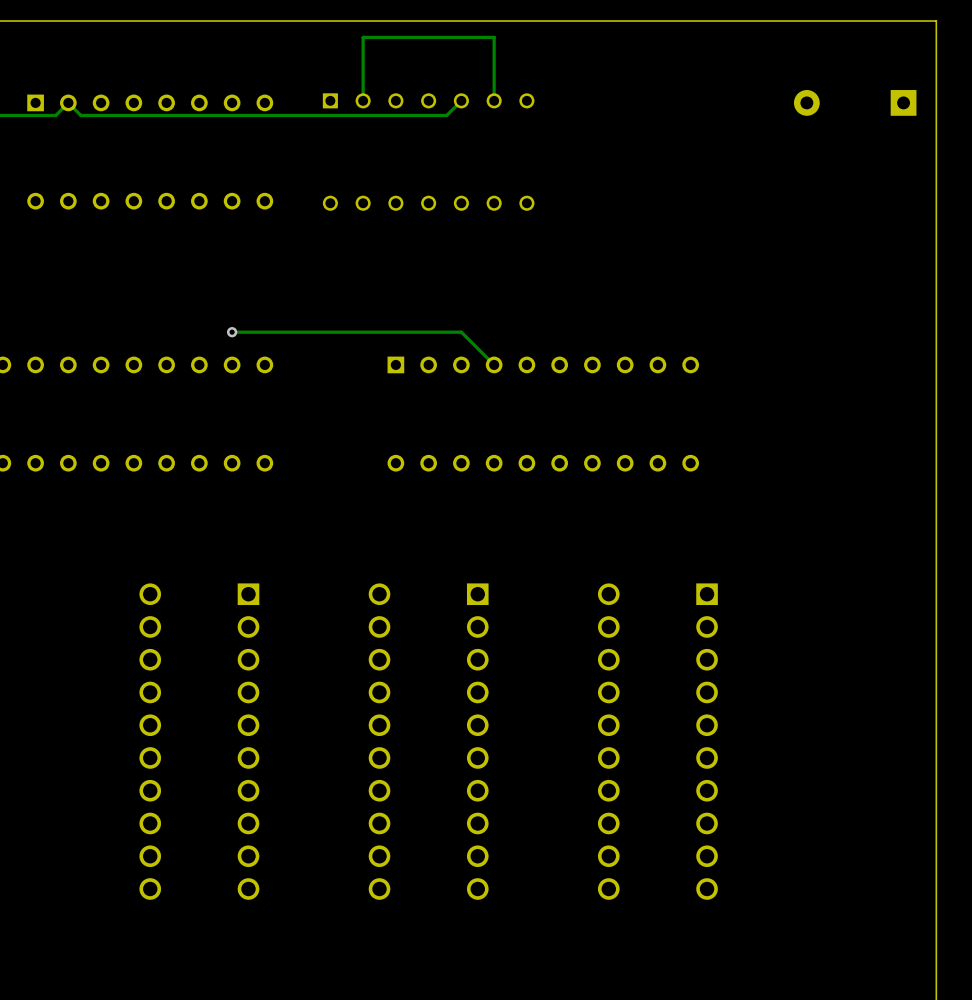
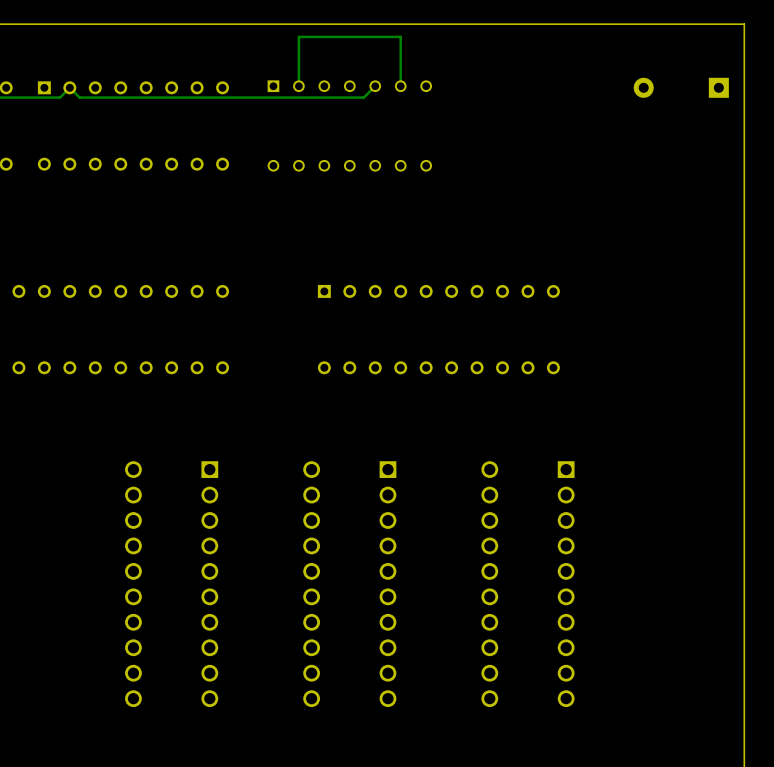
track: (232, 332) (461, 332) (494, 364) -> none
via: (232, 332) -> none

